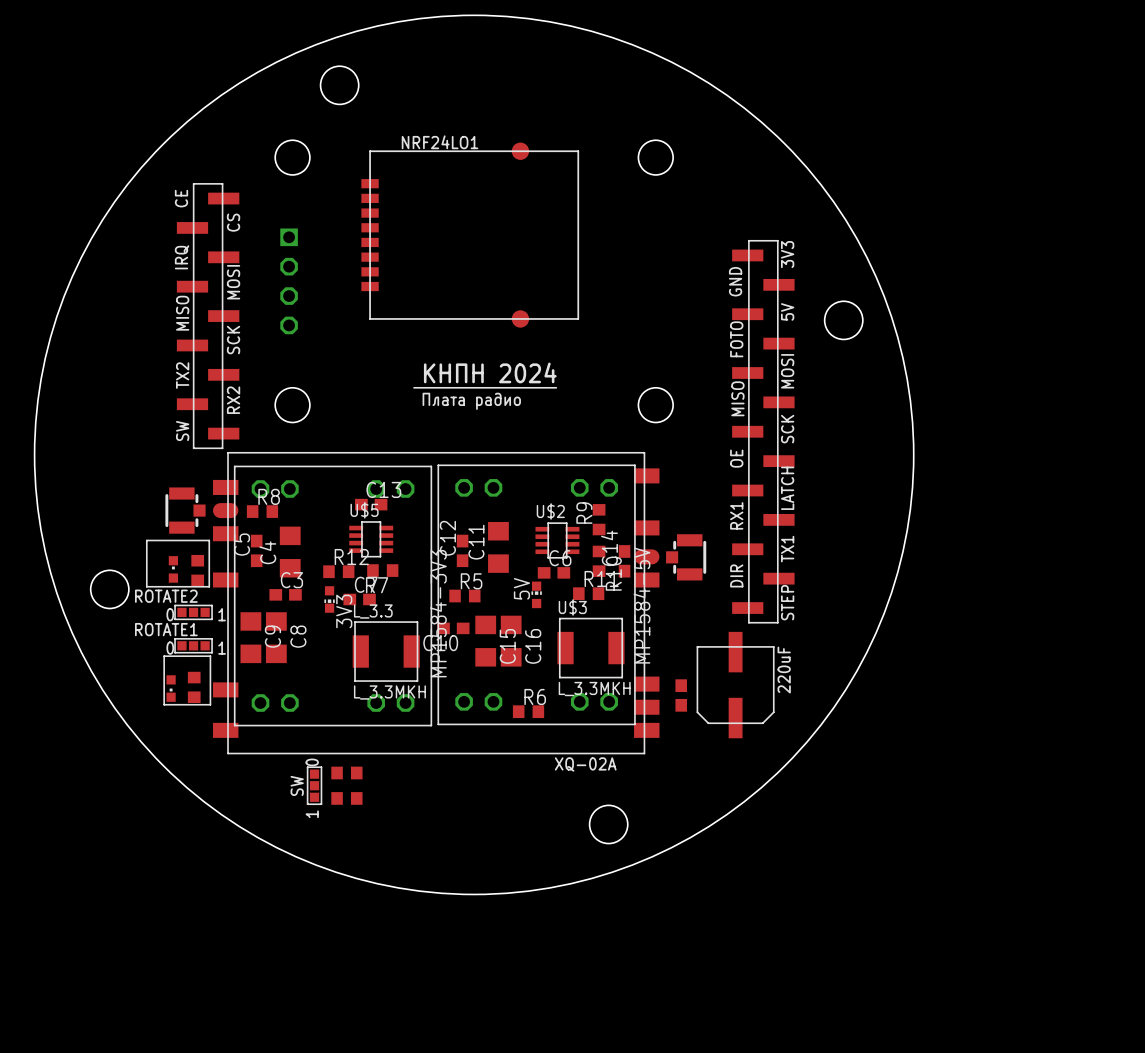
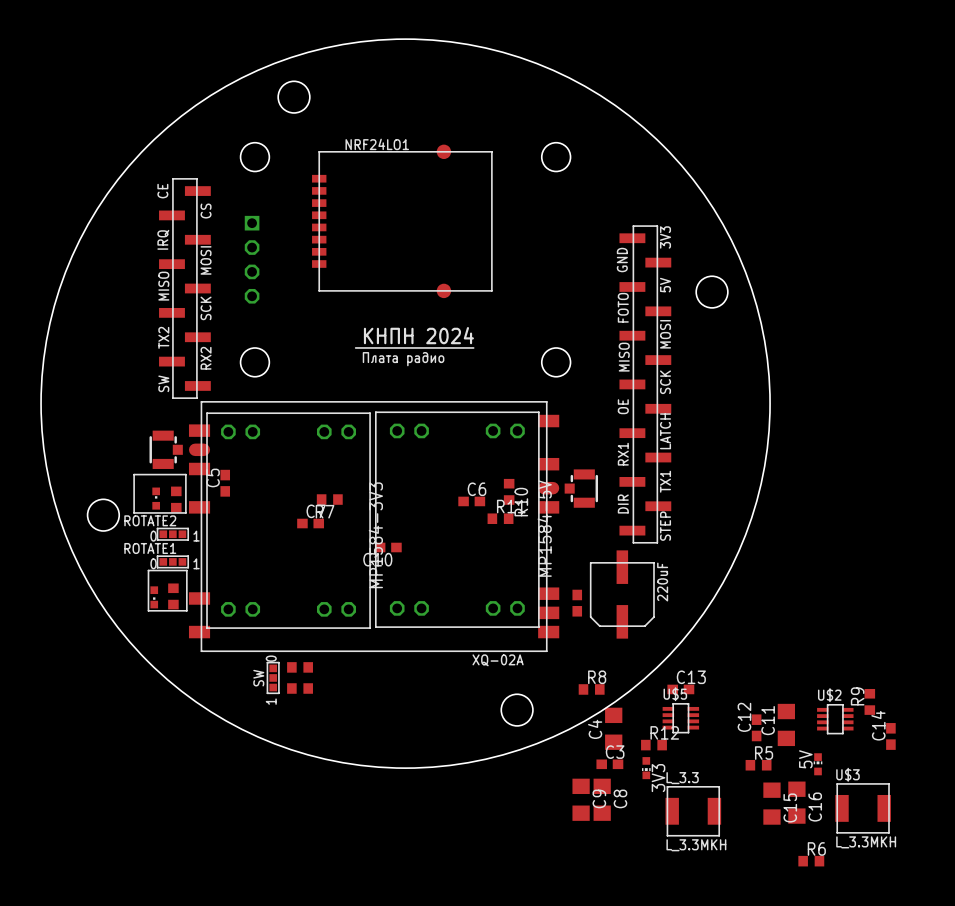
C13 position: (371, 504) -> (680, 689)
R8 position: (262, 511) -> (591, 689)
R9 position: (599, 519) -> (869, 701)
U$5 position: (371, 539) -> (680, 718)
U$2 position: (557, 540) -> (835, 719)
C11 position: (498, 547) -> (786, 724)
C12 position: (462, 550) -> (756, 727)
C4 position: (290, 552) -> (613, 728)
C14 position: (624, 561) -> (890, 736)
R12 position: (338, 571) -> (653, 745)
C3 position: (285, 594) -> (609, 764)
5V position: (536, 594) -> (818, 764)
R5 position: (464, 596) -> (758, 765)
3V3 position: (329, 599) -> (646, 768)
C9 position: (250, 637) -> (581, 799)
C8 position: (276, 637) -> (602, 799)
C15 position: (485, 641) -> (771, 803)
C16 position: (511, 641) -> (796, 802)
U$3 position: (590, 648) -> (863, 808)
L_3.3 position: (386, 651) -> (693, 811)
R6 position: (528, 711) -> (811, 861)

